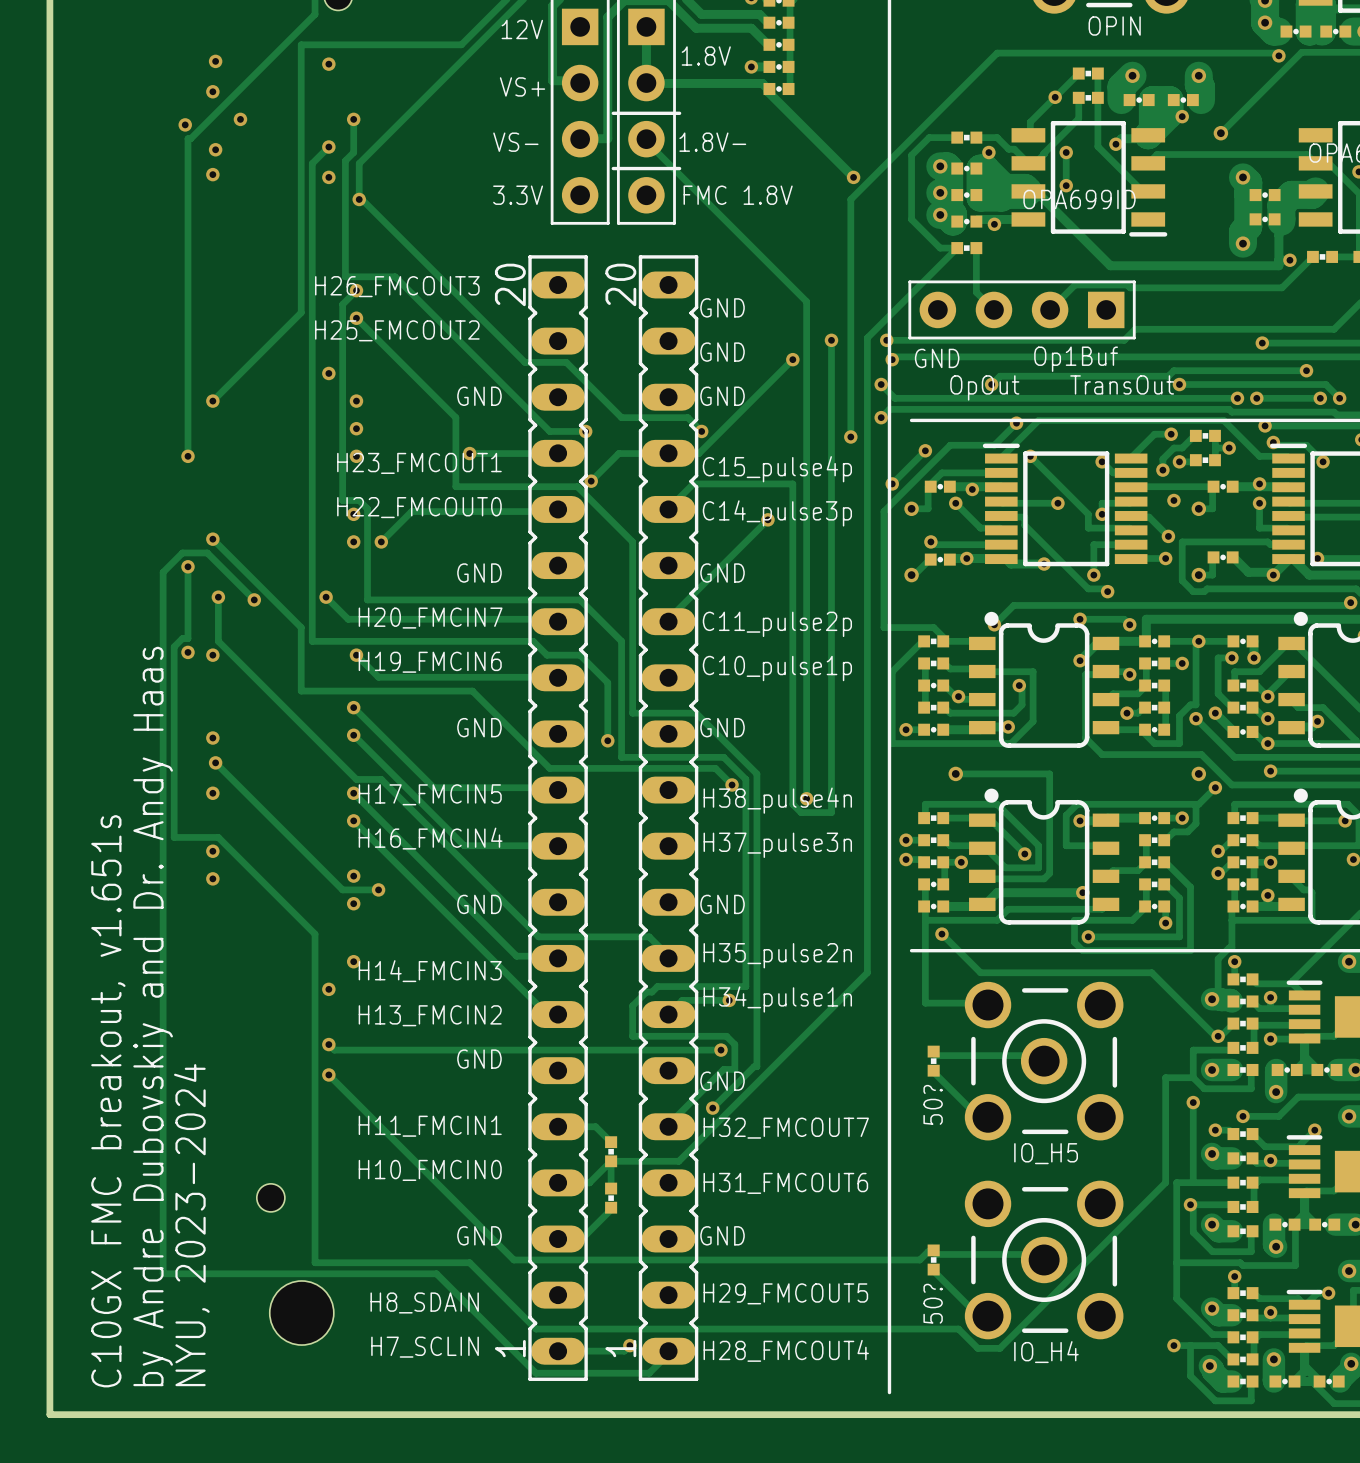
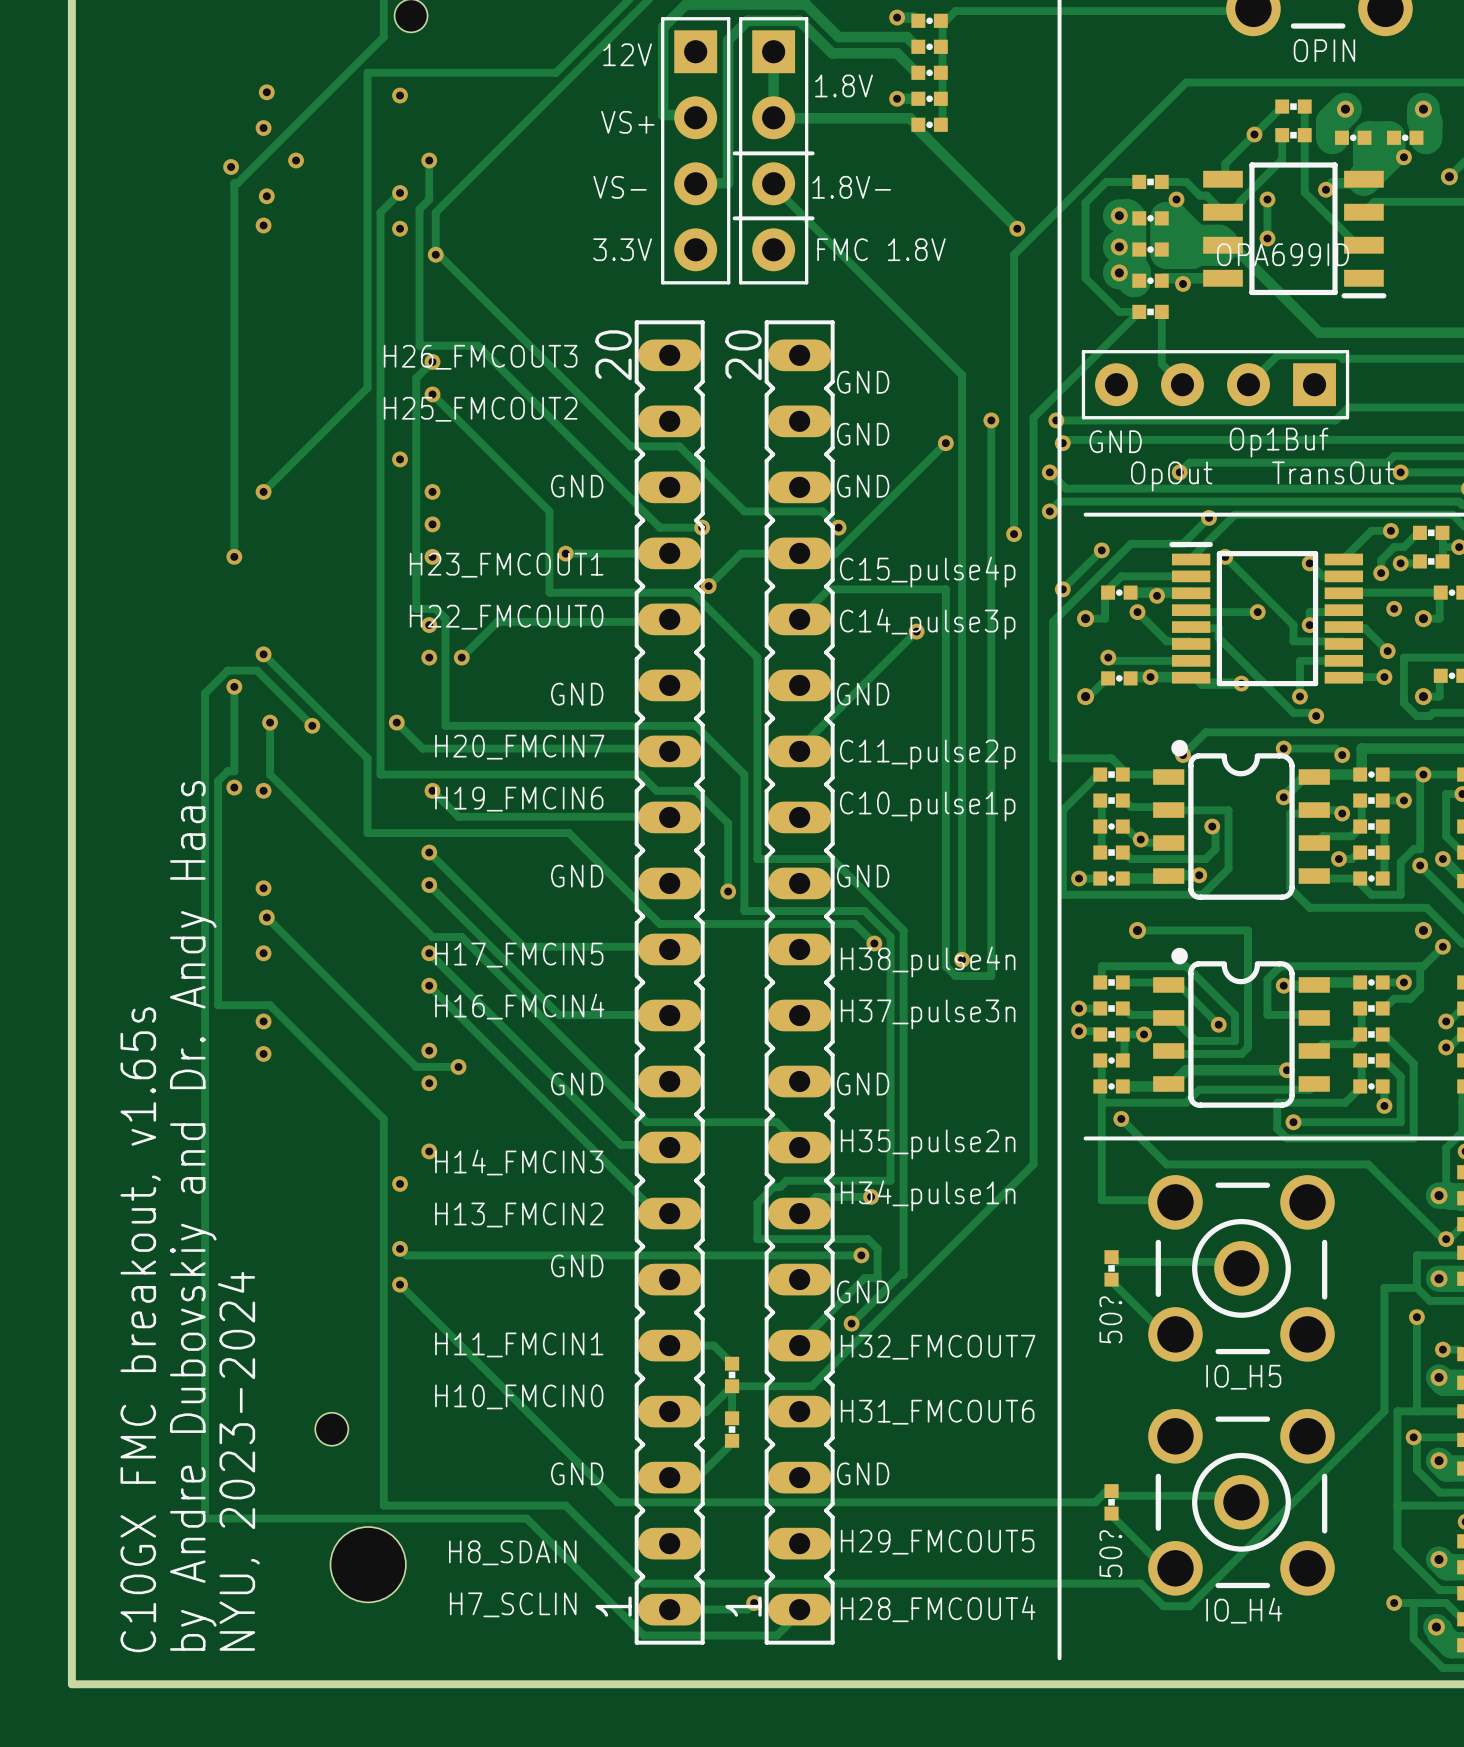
text: C10GX FMC breakout, v1.651s (108, 1101) -> C10GX FMC breakout, v1.65s (140, 1329)

